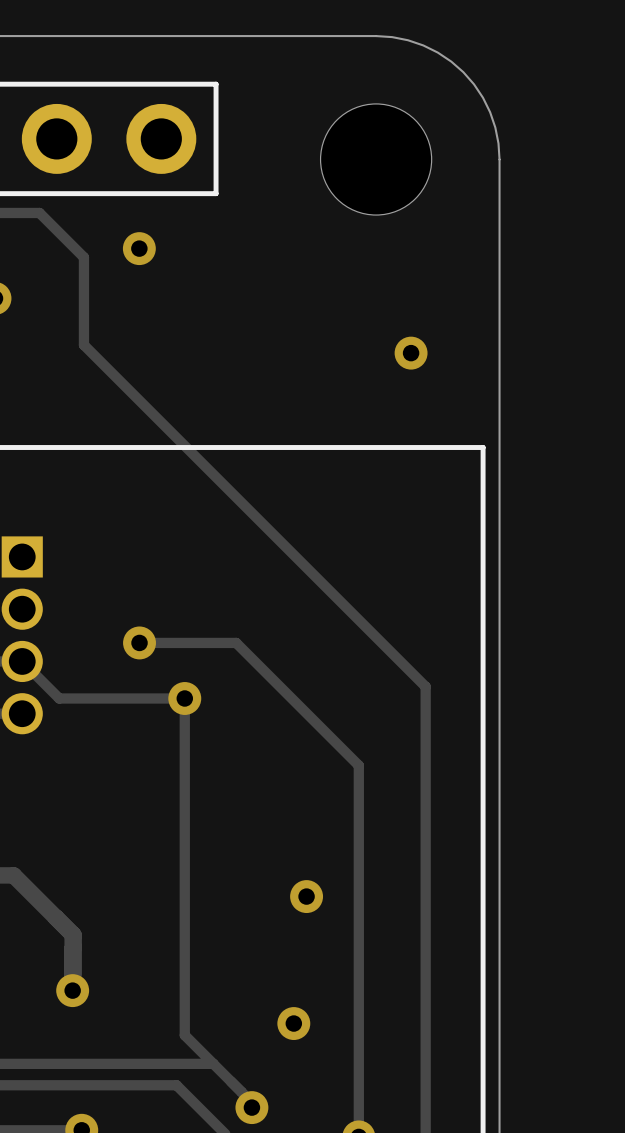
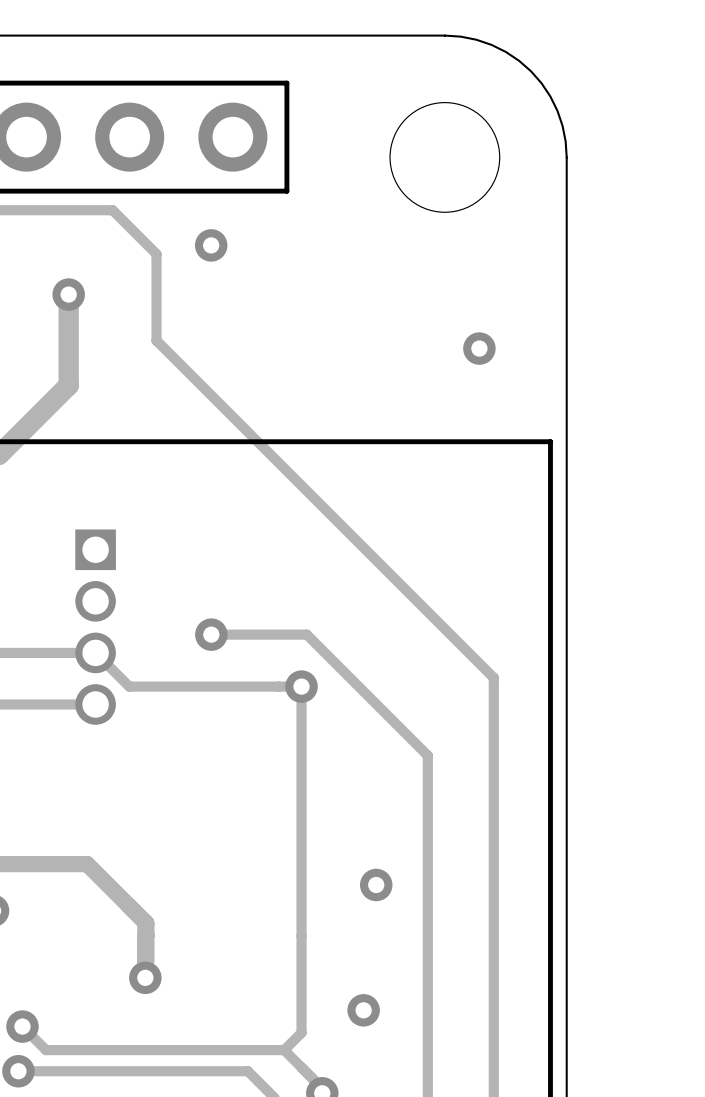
track: (56, 695) (59, 698) (184, 698) (184, 1035) (213, 1063) -> (129, 686) (301, 686) (301, 1032) (284, 1050)
via position: (184, 698) -> (301, 686)

